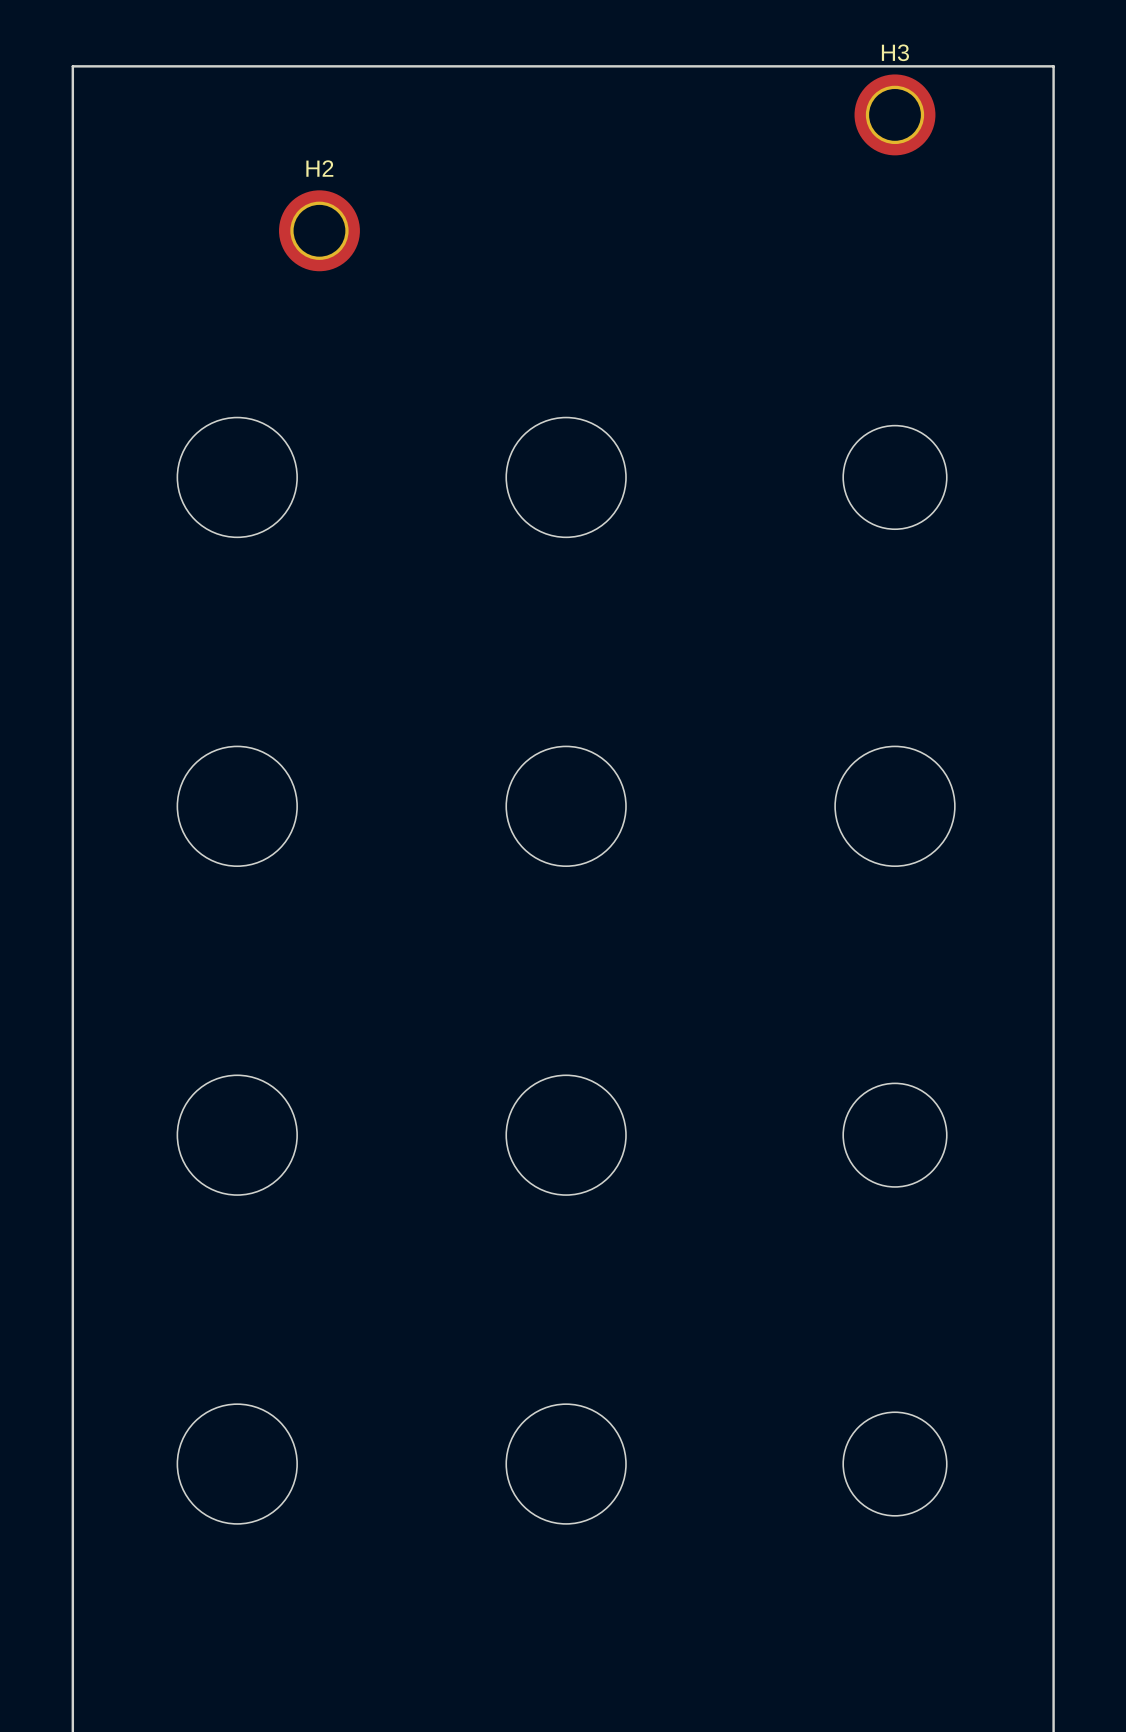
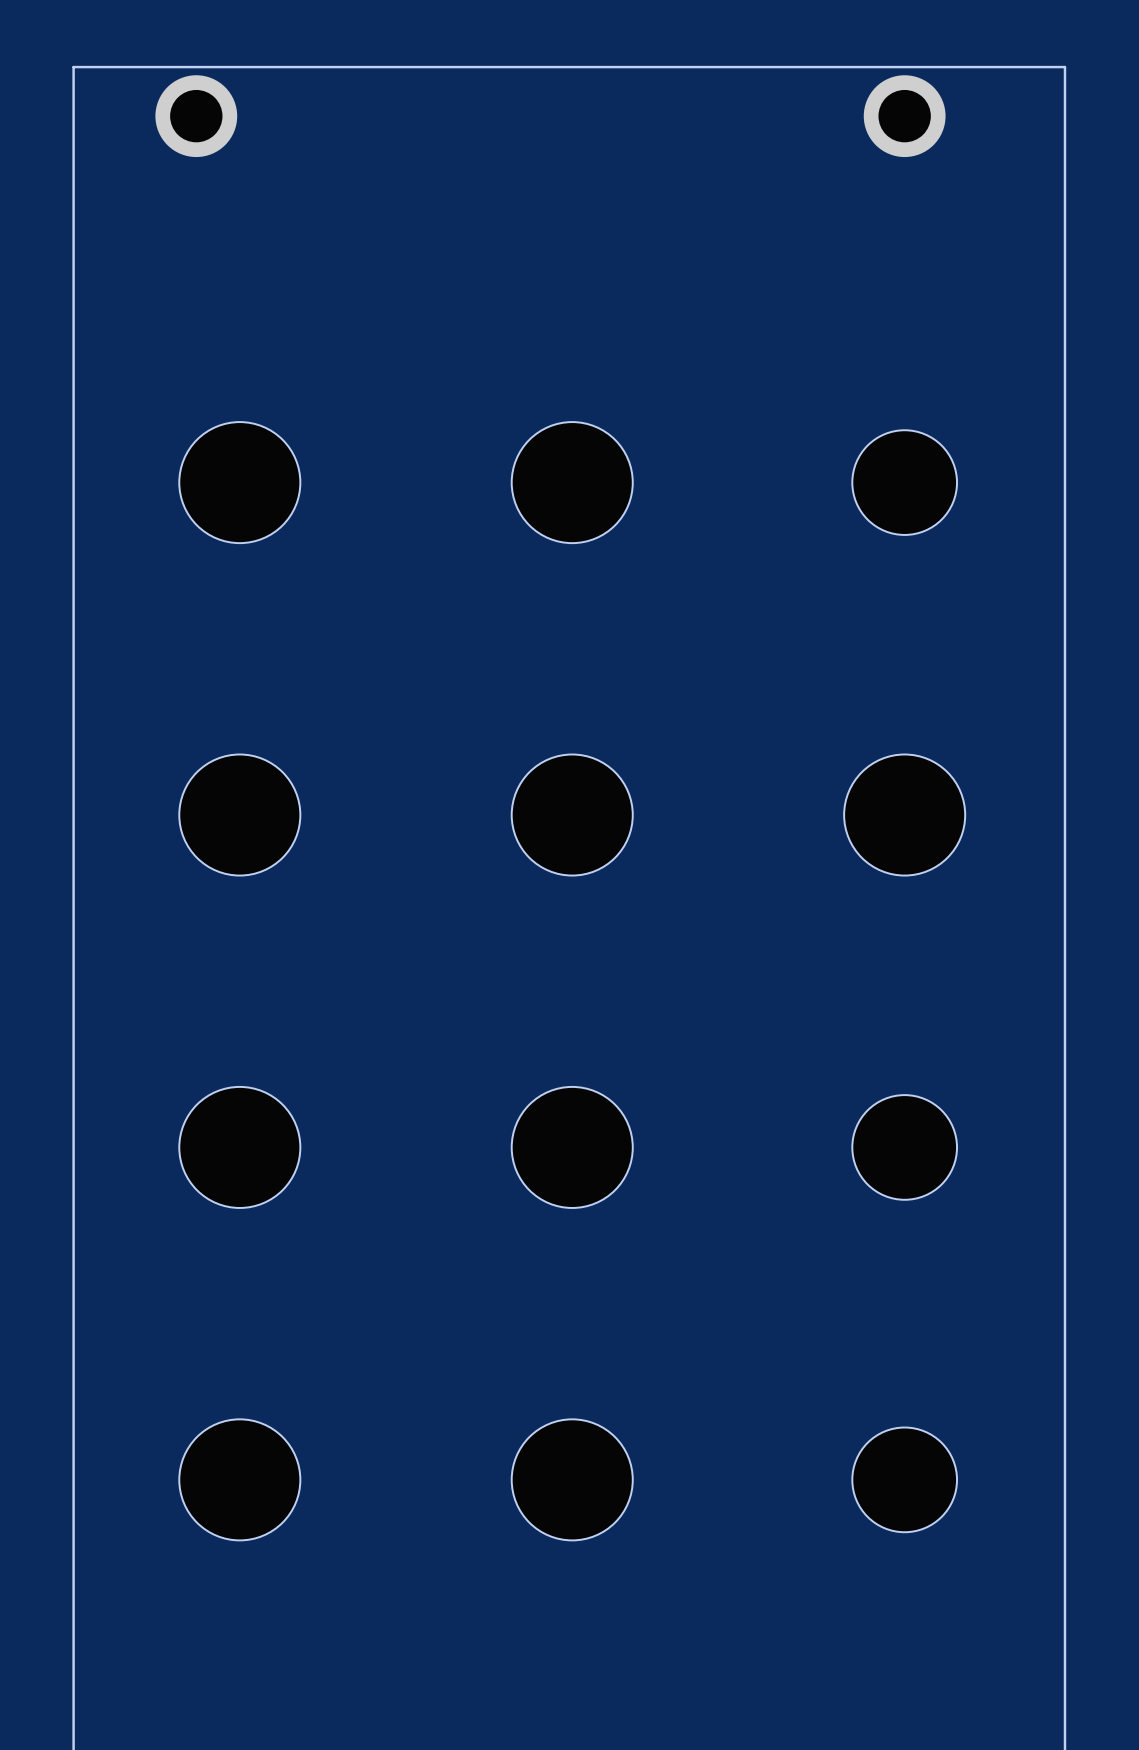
H3 name: H3 (895, 52) -> none
part: none -> (196, 116)
H2: (319, 230) -> none

